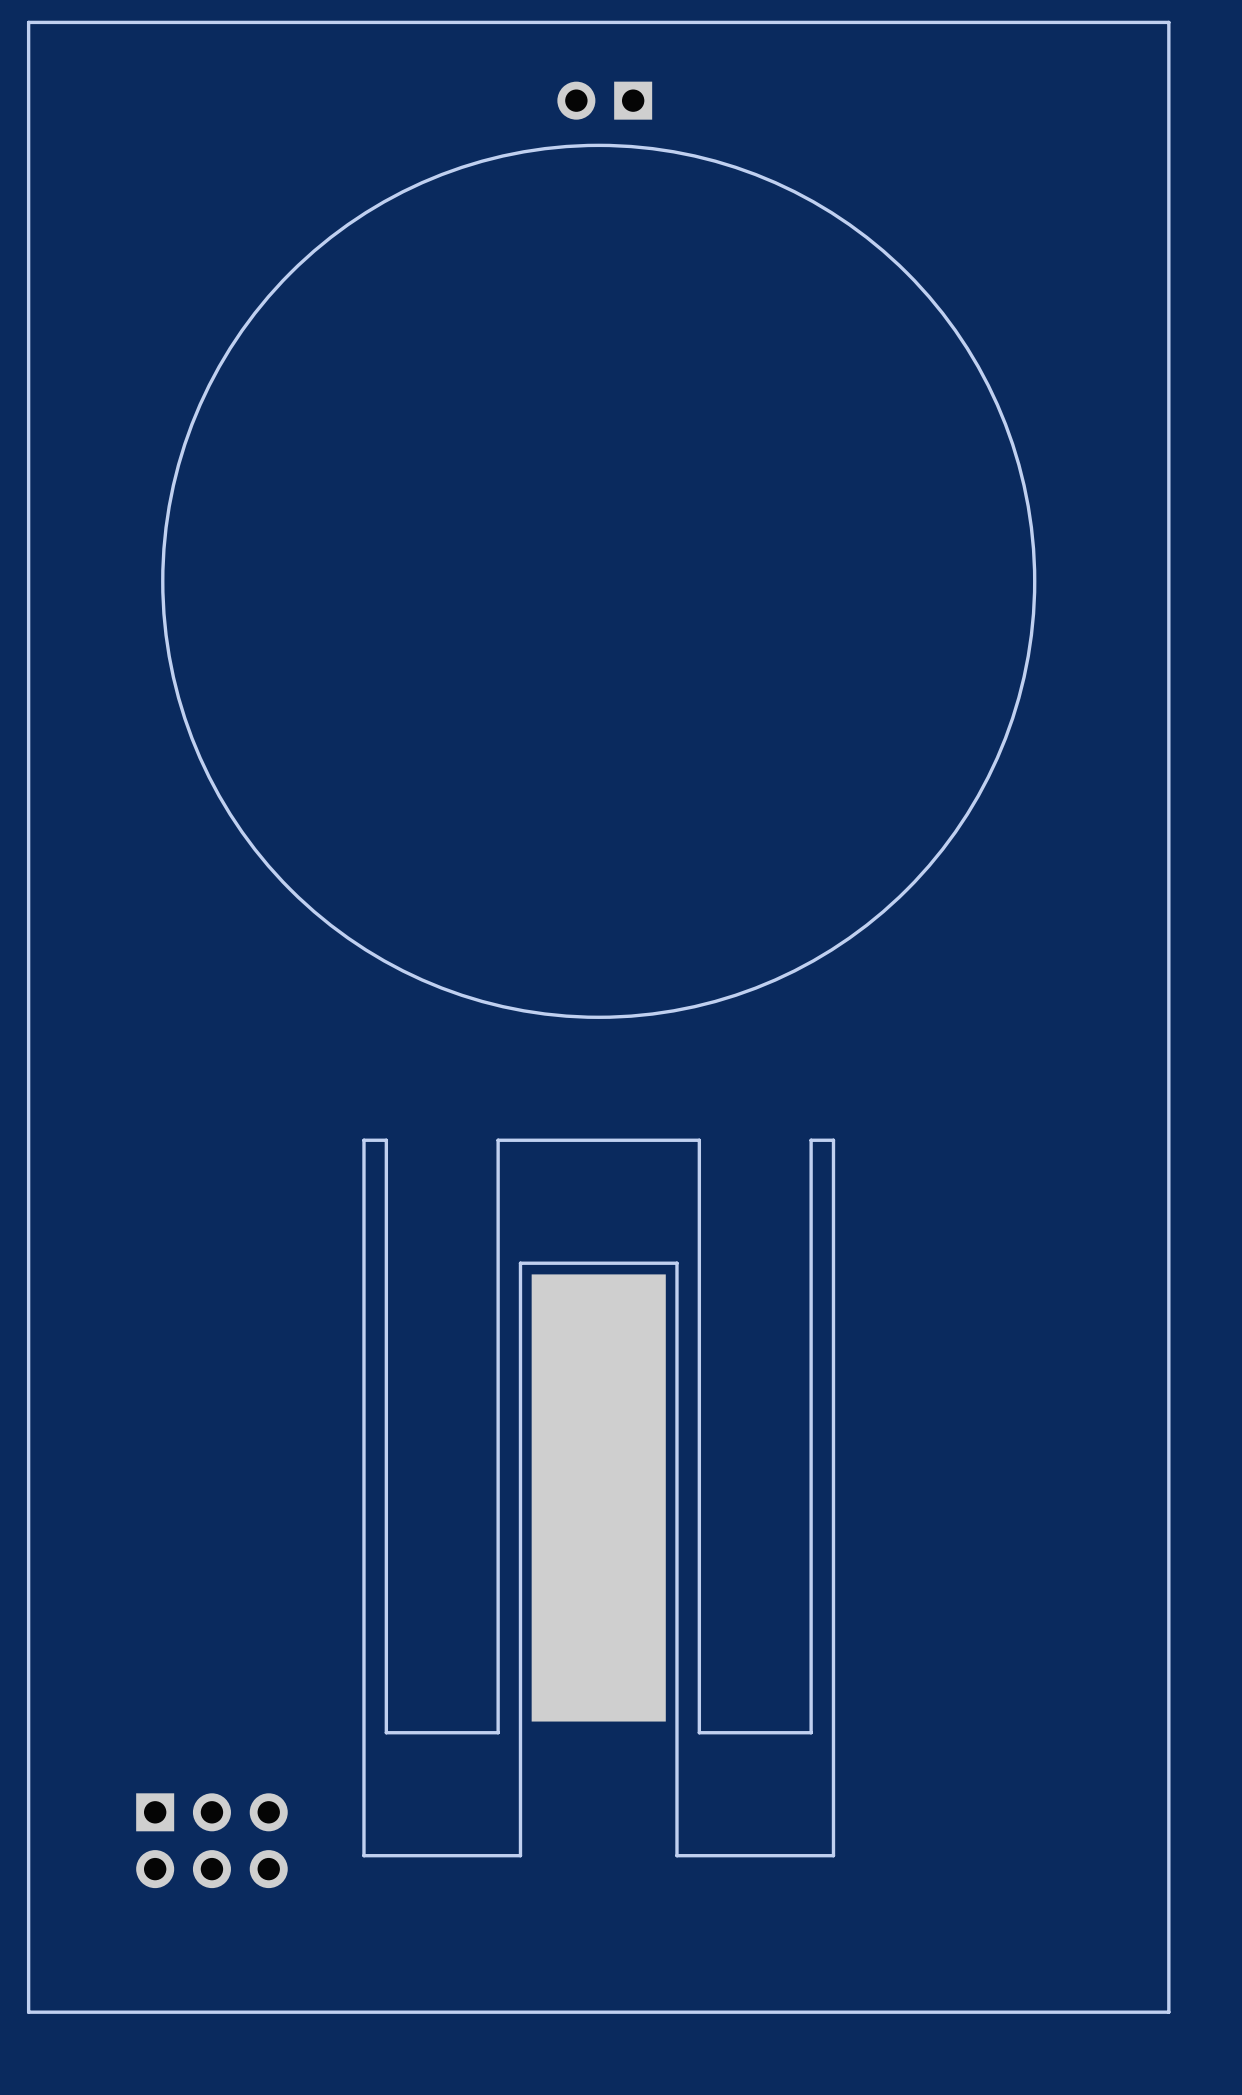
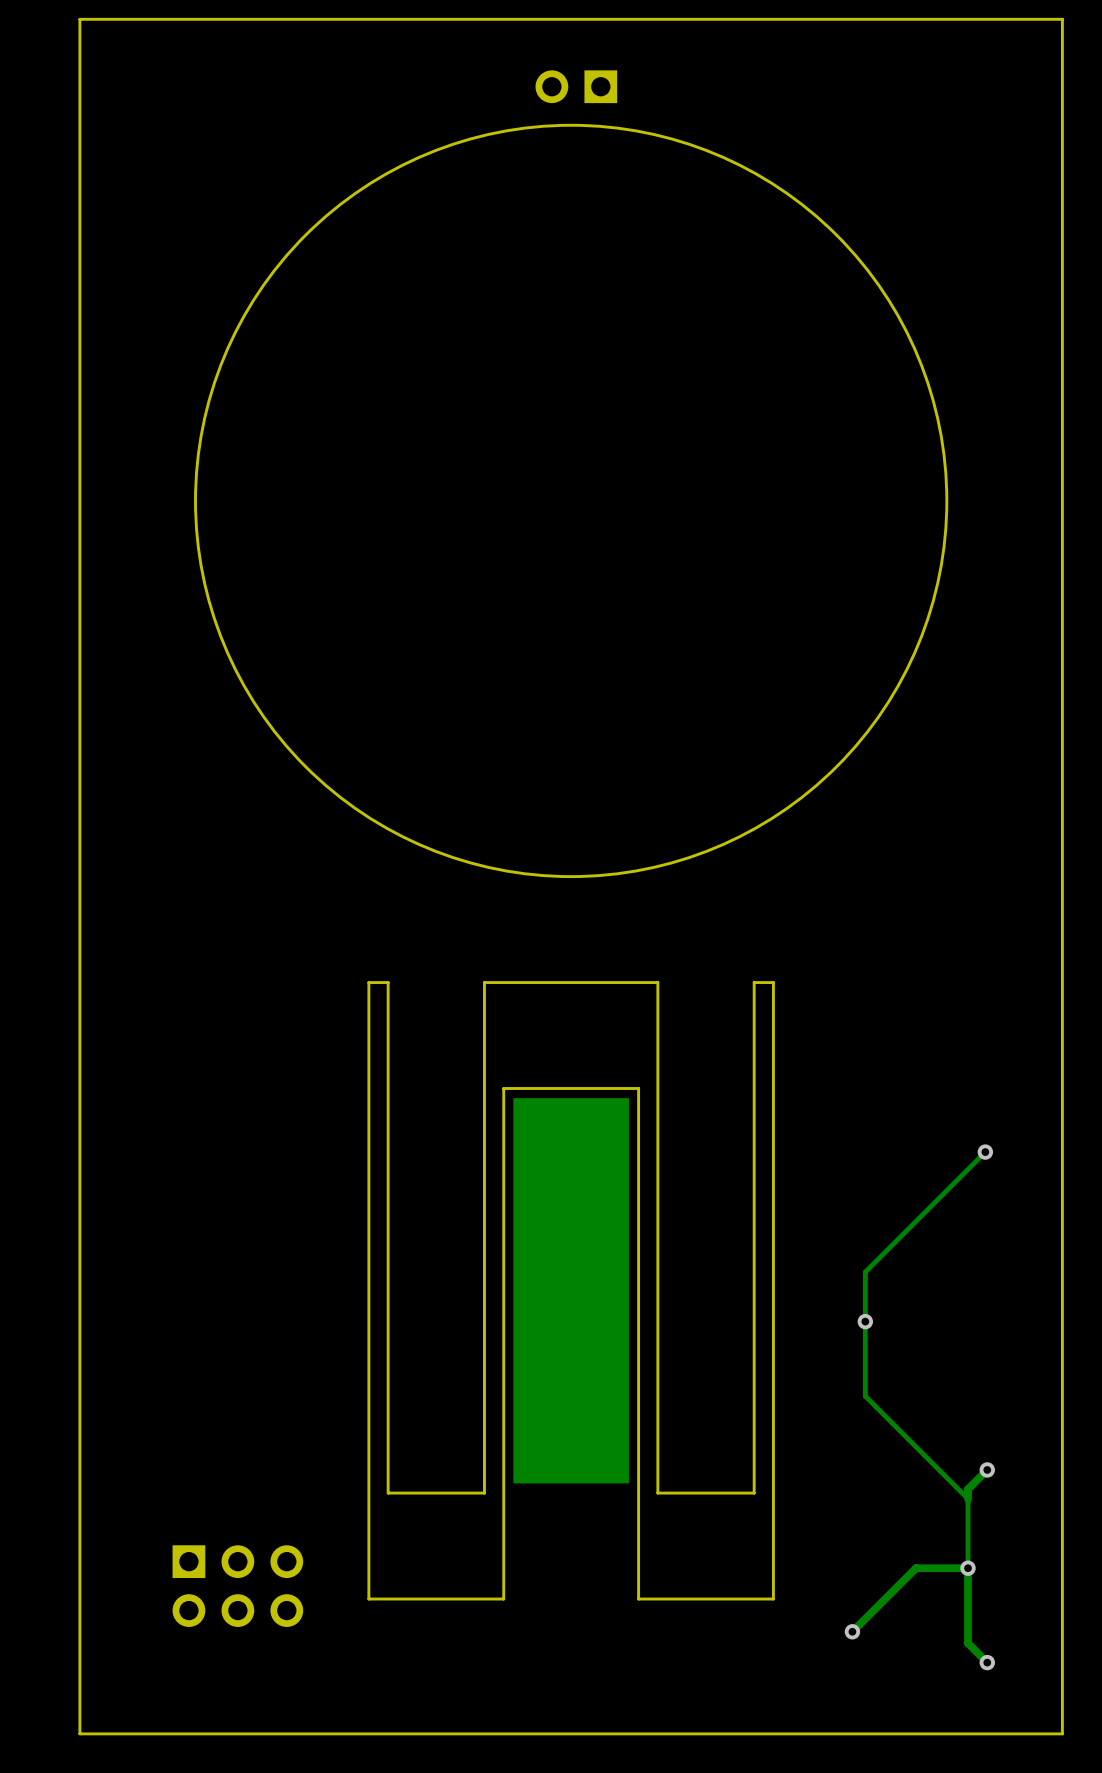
track: none -> (985, 1152) (865, 1272) (865, 1396) (968, 1498)
via: none -> (985, 1152)
via: none -> (865, 1321)
track: none -> (987, 1469) (968, 1489) (968, 1498)
via: none -> (987, 1469)
track: none -> (968, 1498) (968, 1568)
track: none -> (968, 1568) (968, 1643) (987, 1662)
track: none -> (968, 1568) (916, 1568) (852, 1631)
via: none -> (968, 1568)
via: none -> (852, 1631)
via: none -> (987, 1662)

